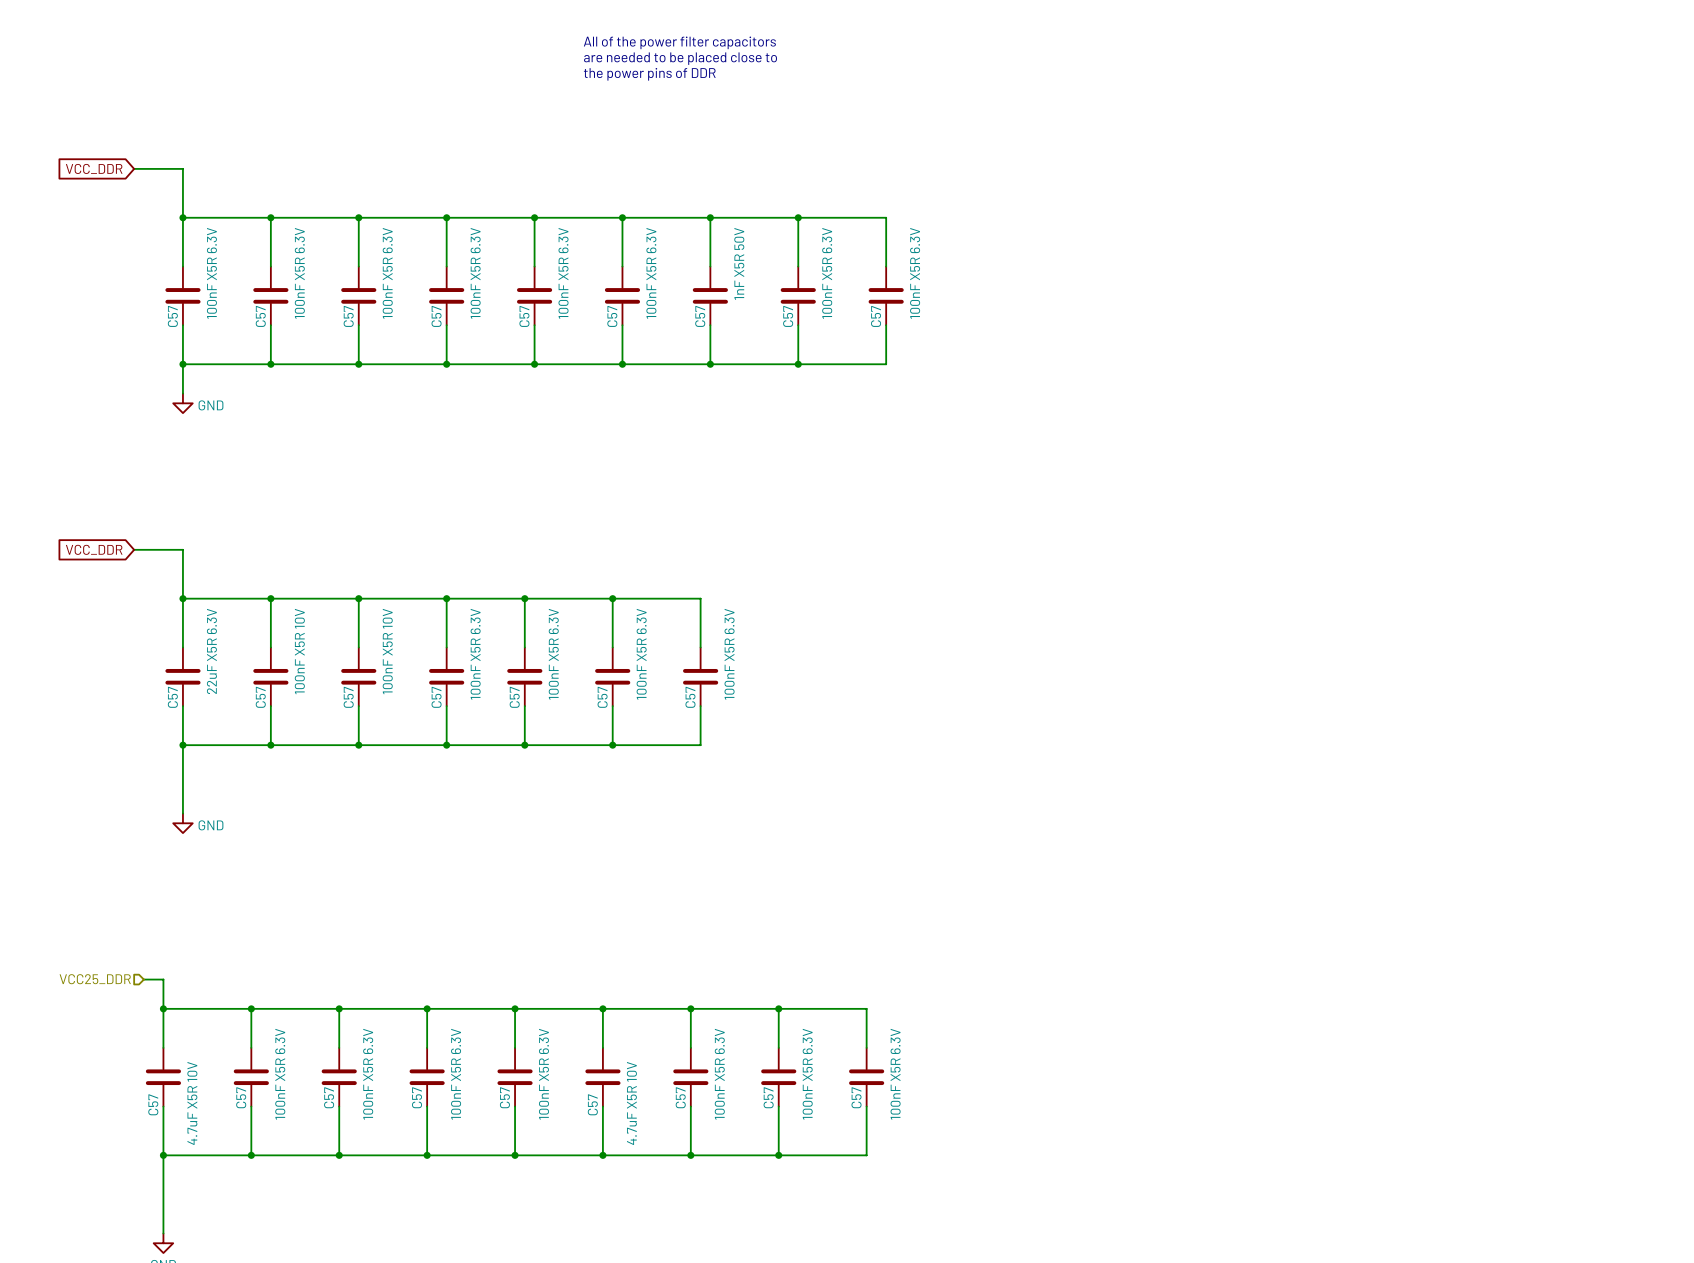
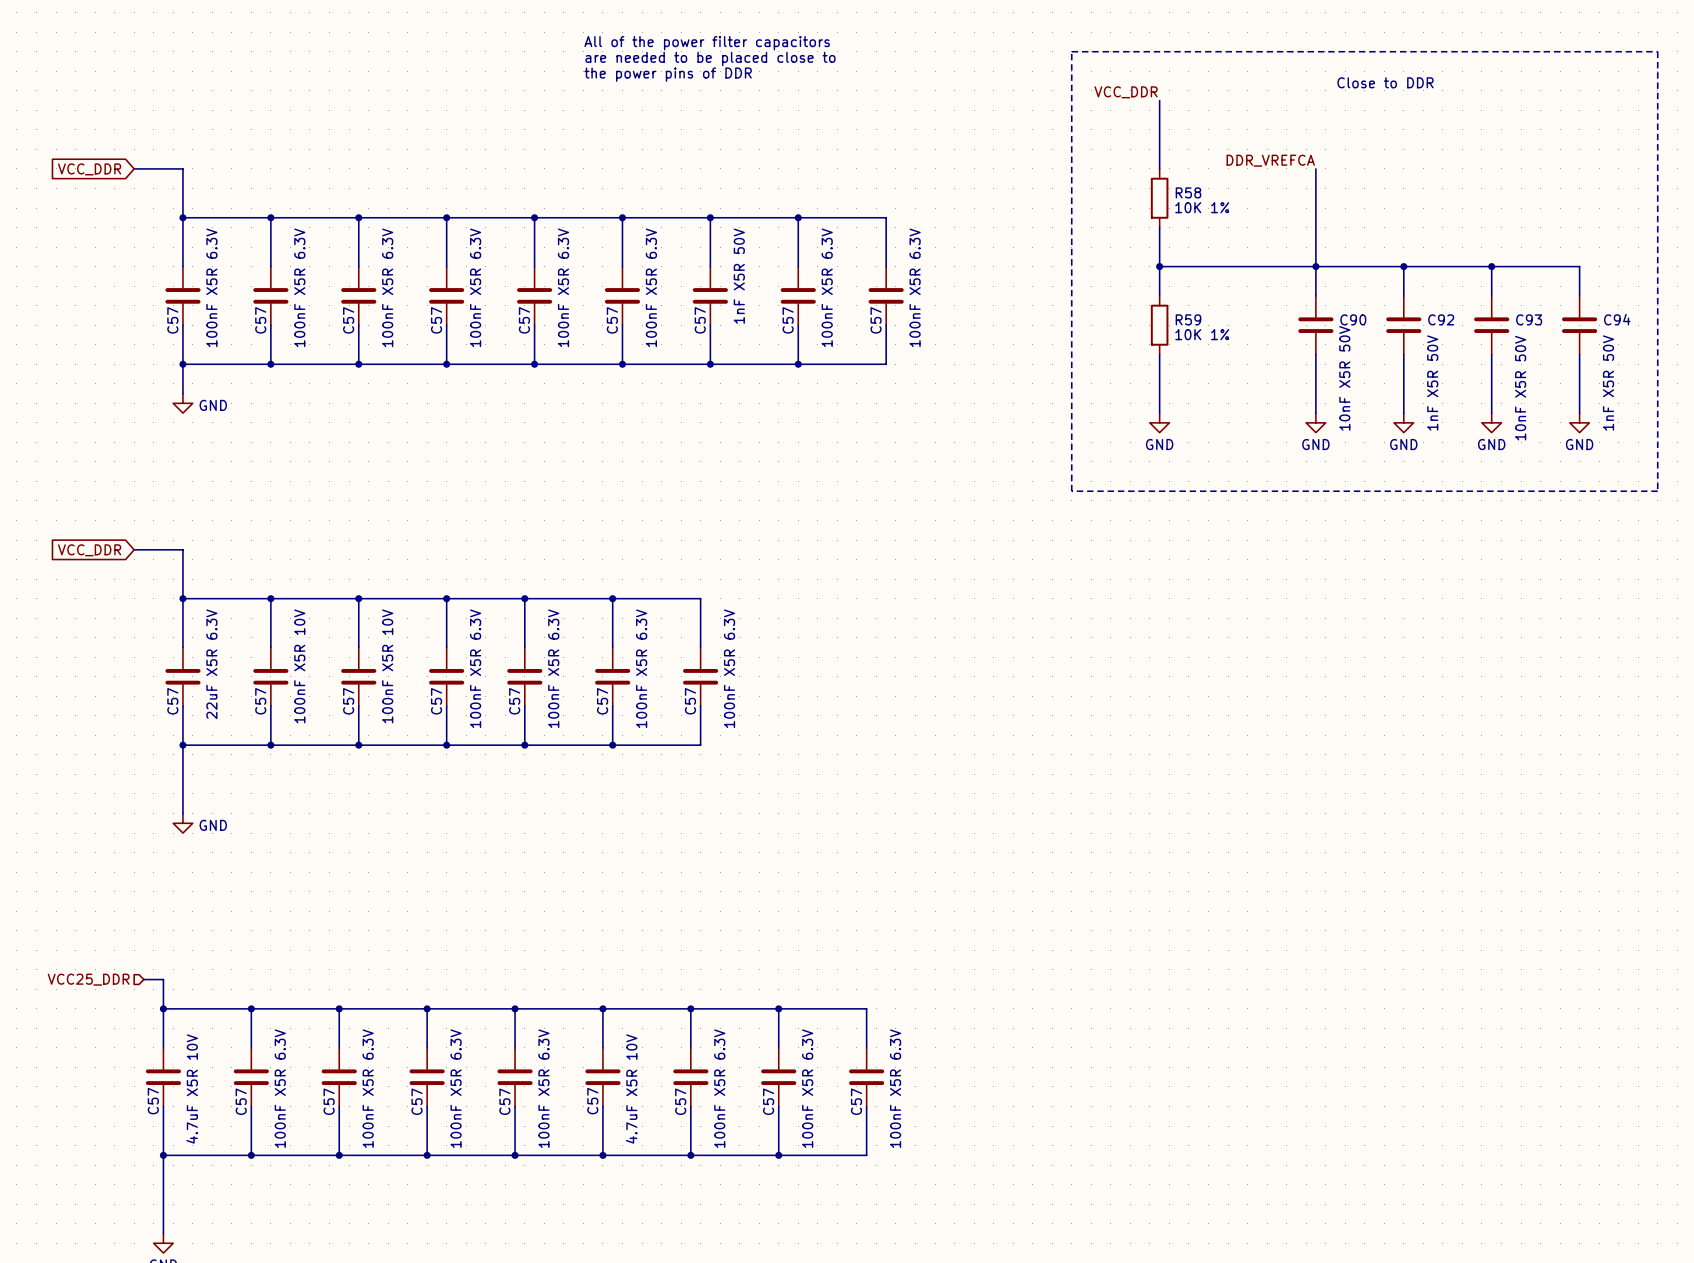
line: none -> (1071, 51) (1657, 51) (1657, 491) (1071, 491) (1071, 51)
text: none -> Close to DDR (1385, 82)
label: none -> VCC_DDR (1126, 92)
wire: none -> (1159, 100) (1159, 168)
label: none -> DDR_VREFCA (1270, 160)
wire: none -> (1315, 168) (1315, 295)
R58: none -> 10K 1% (1159, 198)
wire: none -> (1159, 227) (1159, 295)
wire: none -> (1159, 266) (1579, 266) (1579, 295)
junction: none -> (1159, 266)
junction: none -> (1315, 266)
wire: none -> (1403, 266) (1403, 295)
junction: none -> (1403, 266)
wire: none -> (1491, 266) (1491, 295)
junction: none -> (1491, 266)
R59: none -> 10K 1% (1159, 325)
C90: none -> 10nF X5R 50V (1315, 325)
C92: none -> 1nF X5R 50V (1403, 325)
C93: none -> 10nF X5R 50V (1491, 325)
C94: none -> 1nF X5R 50V (1579, 325)
wire: none -> (1159, 354) (1159, 413)
wire: none -> (1315, 354) (1315, 413)
wire: none -> (1403, 354) (1403, 413)
wire: none -> (1491, 354) (1491, 413)
wire: none -> (1579, 354) (1579, 413)
power symbol: none -> GND (1159, 422)
power symbol: none -> GND (1315, 422)
power symbol: none -> GND (1403, 422)
power symbol: none -> GND (1491, 422)
power symbol: none -> GND (1579, 422)

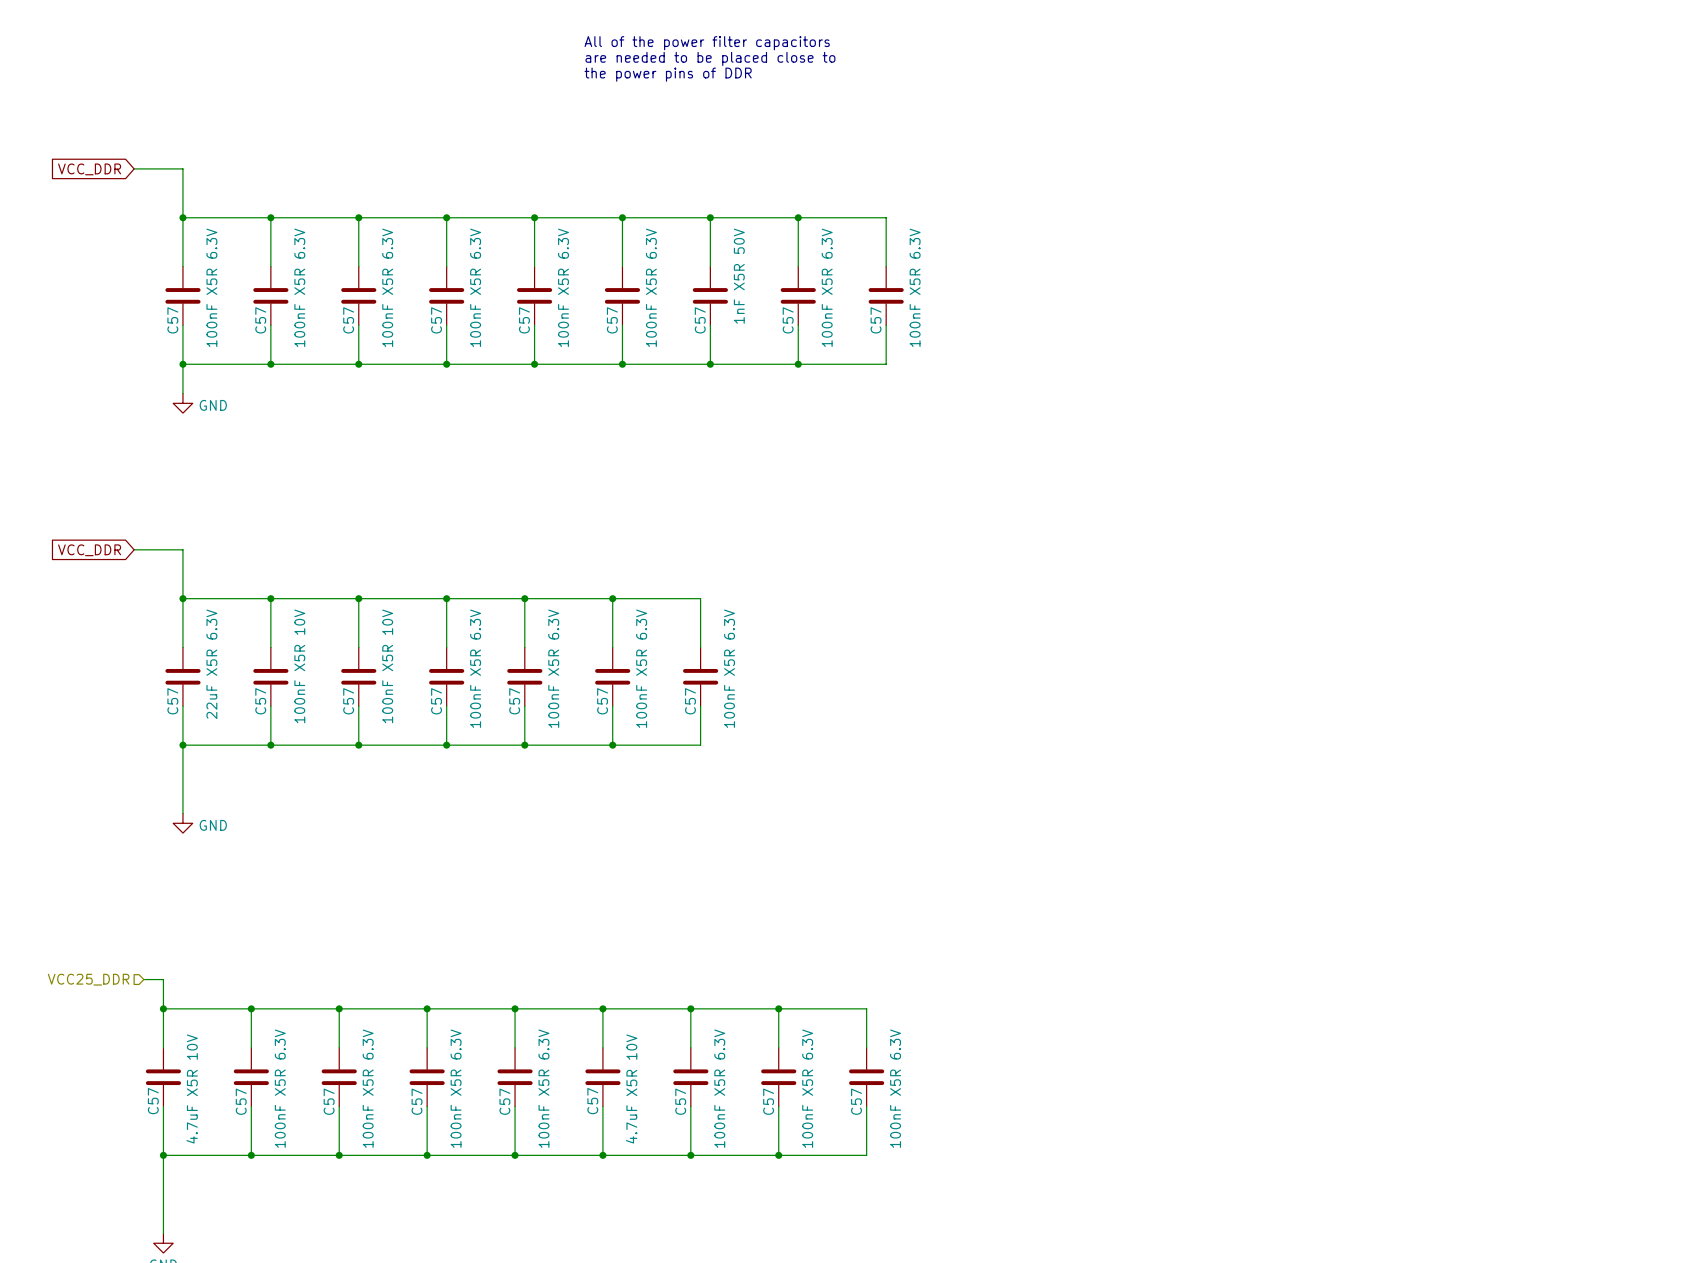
line: (1071, 51) (1657, 51) (1657, 491) (1071, 491) (1071, 51) -> none
text: Close to DDR (1385, 82) -> none
label: VCC_DDR (1126, 92) -> none
wire: (1159, 100) (1159, 168) -> none
label: DDR_VREFCA (1270, 160) -> none
wire: (1315, 168) (1315, 295) -> none
R58: 10K 1% (1159, 198) -> none
wire: (1159, 227) (1159, 295) -> none
wire: (1159, 266) (1579, 266) (1579, 295) -> none
junction: (1159, 266) -> none
junction: (1315, 266) -> none
wire: (1403, 266) (1403, 295) -> none
junction: (1403, 266) -> none
wire: (1491, 266) (1491, 295) -> none
junction: (1491, 266) -> none
R59: 10K 1% (1159, 325) -> none
C90: 10nF X5R 50V (1315, 325) -> none
C92: 1nF X5R 50V (1403, 325) -> none
C93: 10nF X5R 50V (1491, 325) -> none
C94: 1nF X5R 50V (1579, 325) -> none
wire: (1159, 354) (1159, 413) -> none
wire: (1315, 354) (1315, 413) -> none
wire: (1403, 354) (1403, 413) -> none
wire: (1491, 354) (1491, 413) -> none
wire: (1579, 354) (1579, 413) -> none
power symbol: GND (1159, 422) -> none
power symbol: GND (1315, 422) -> none
power symbol: GND (1403, 422) -> none
power symbol: GND (1491, 422) -> none
power symbol: GND (1579, 422) -> none

